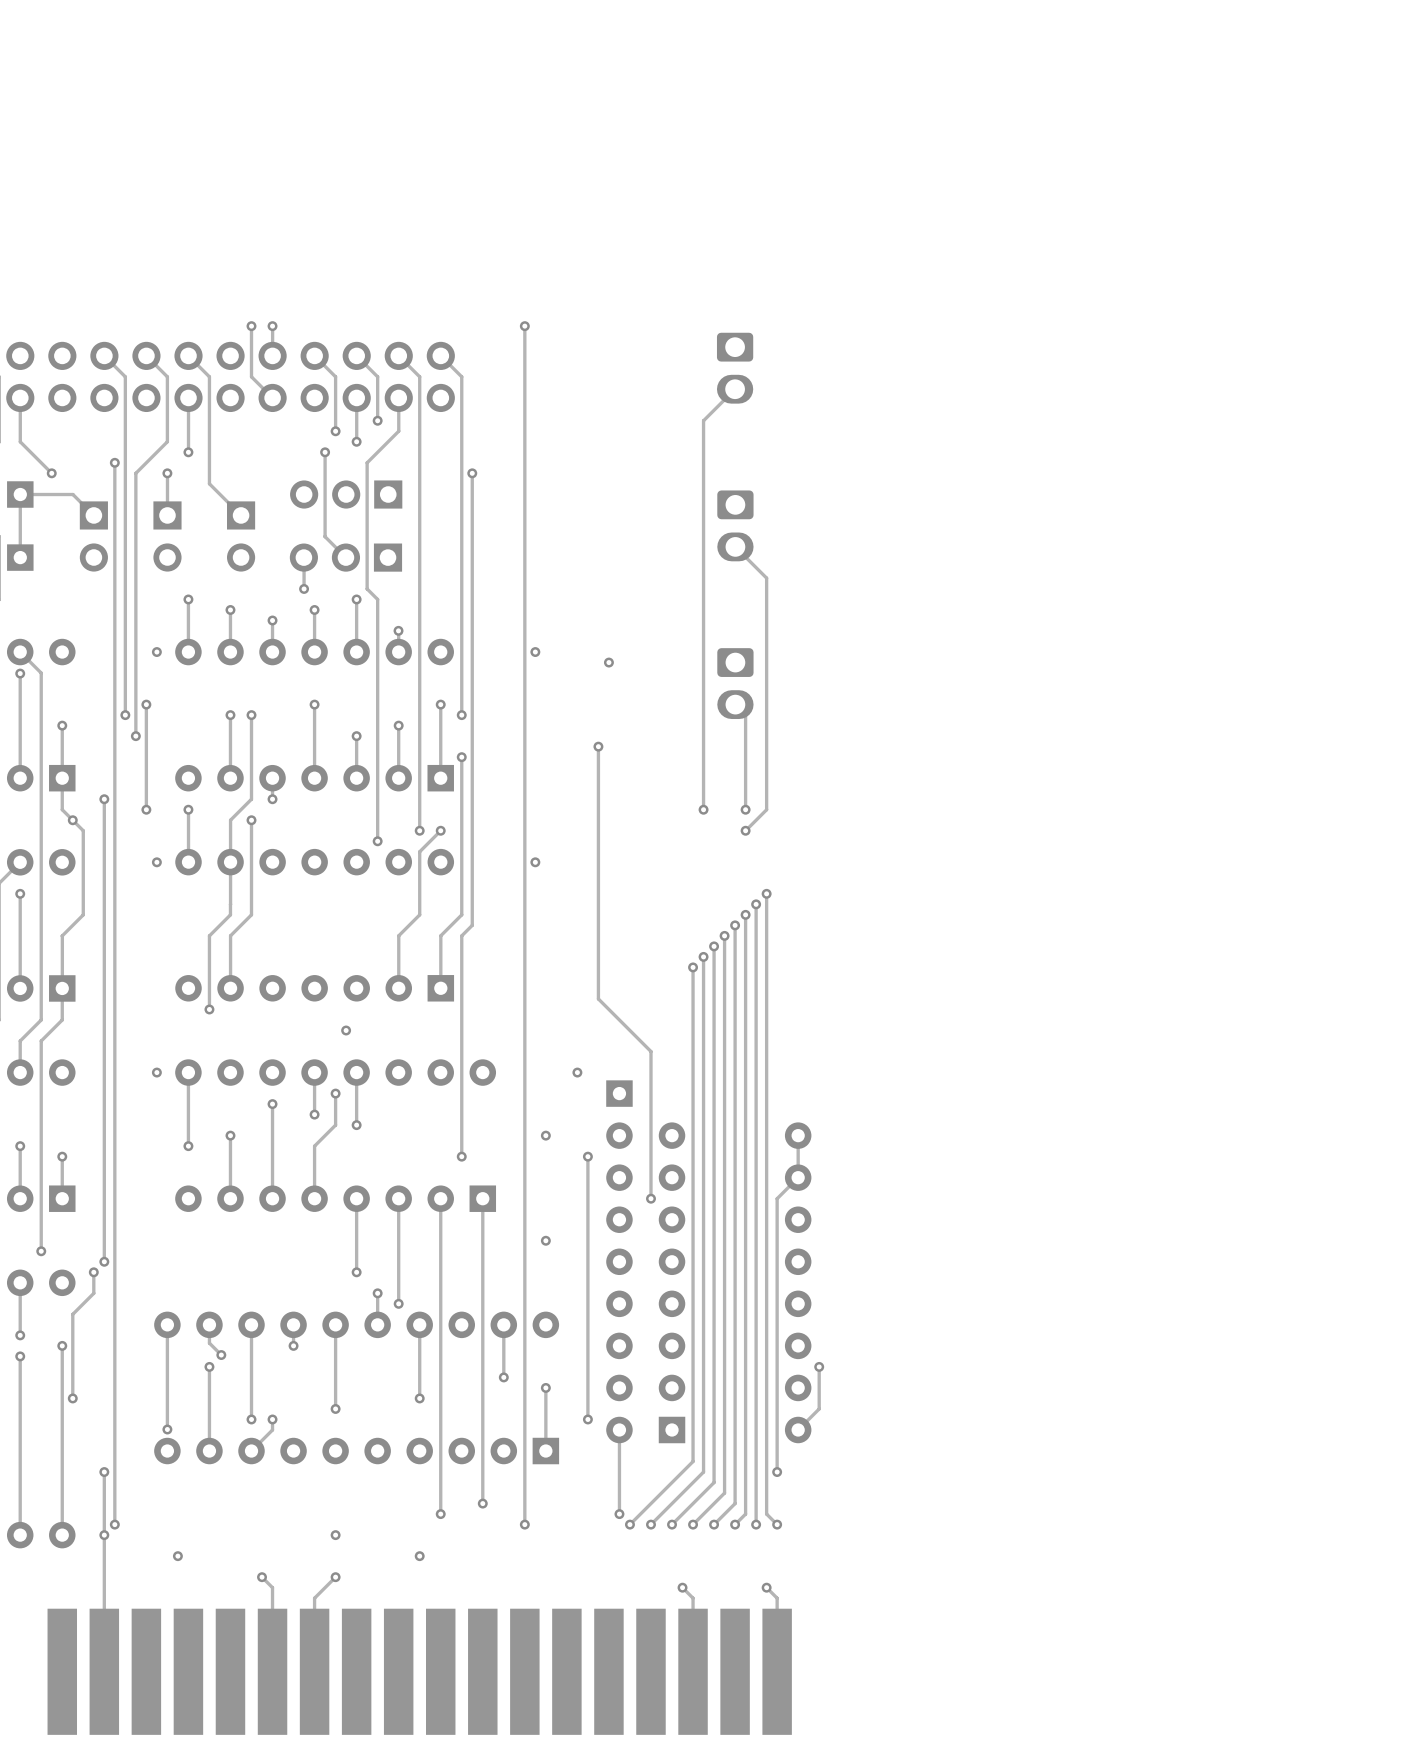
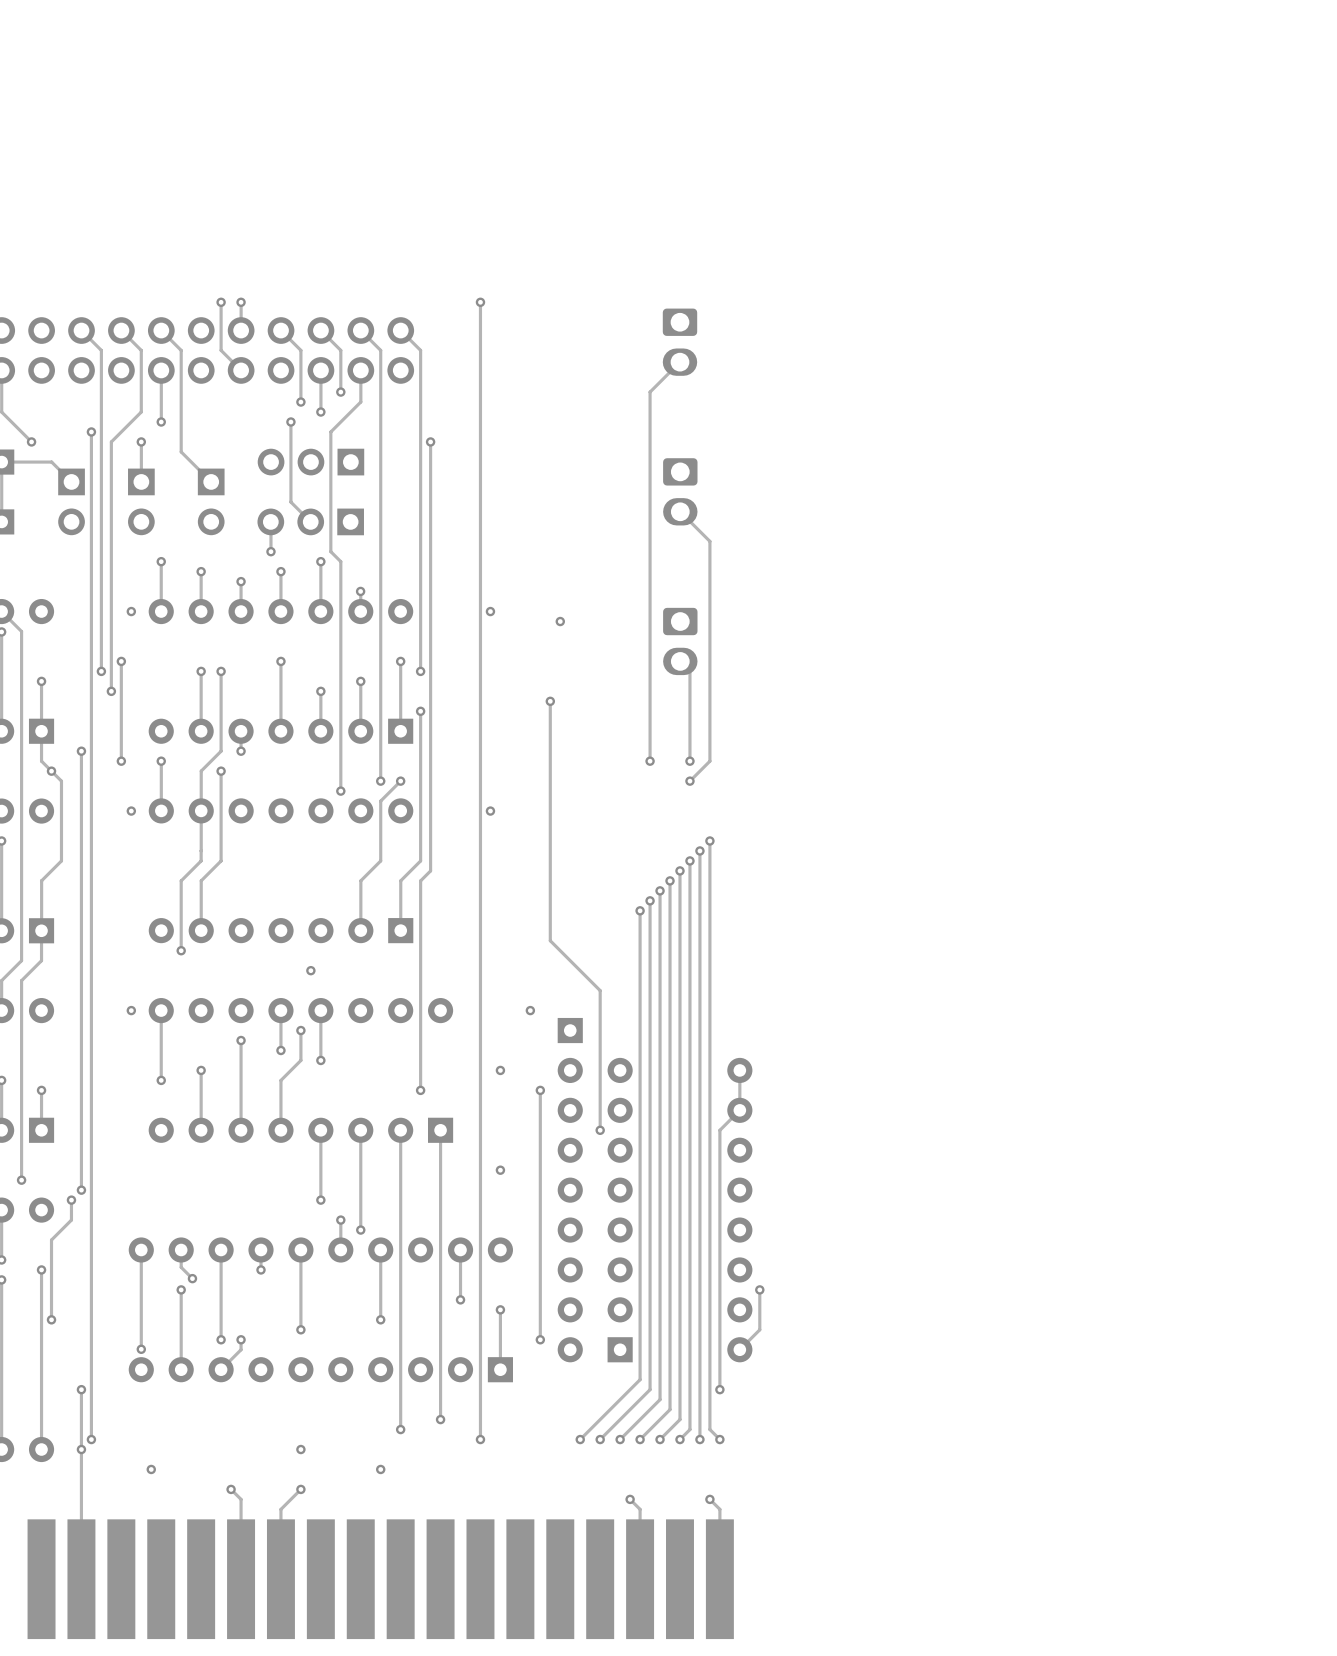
track: (619, 1429) (619, 1514) -> none
via: (619, 1514) -> none

